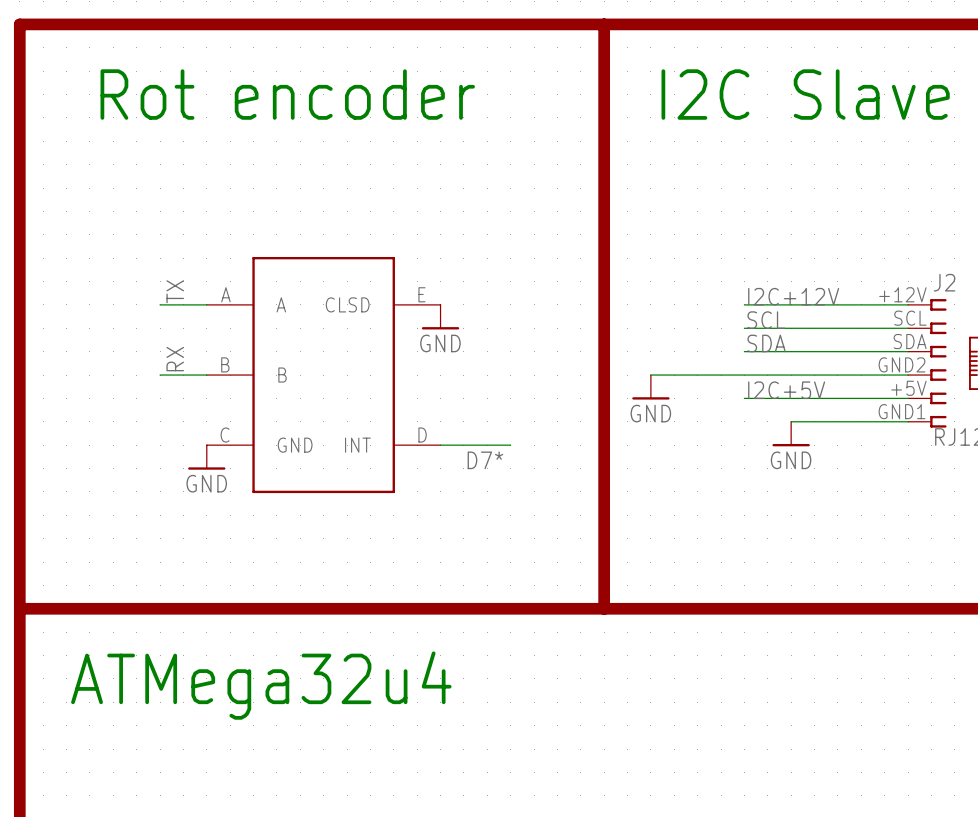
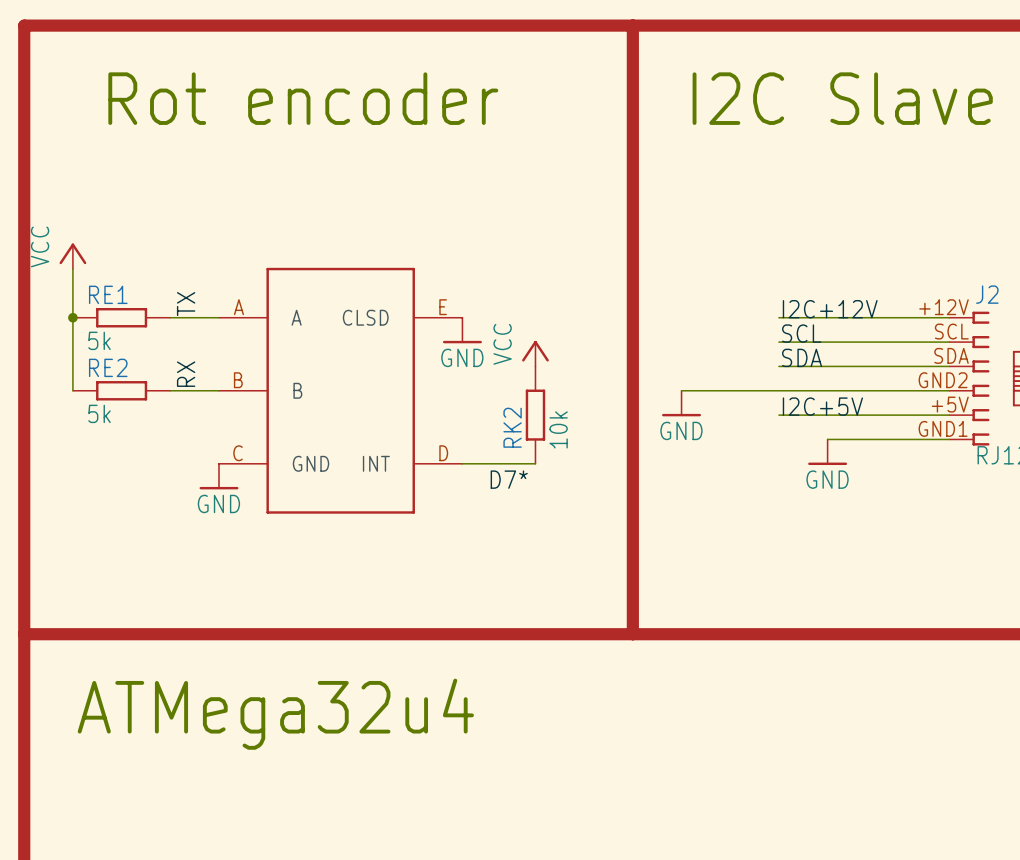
power symbol: none -> VCC (72, 256)
wire: none -> (72, 269) (72, 390)
junction: none -> (72, 317)
RE1: none -> 5k (121, 317)
power symbol: none -> VCC (535, 353)
RE2: none -> 5k (121, 390)
RK2: none -> 10k (535, 415)

